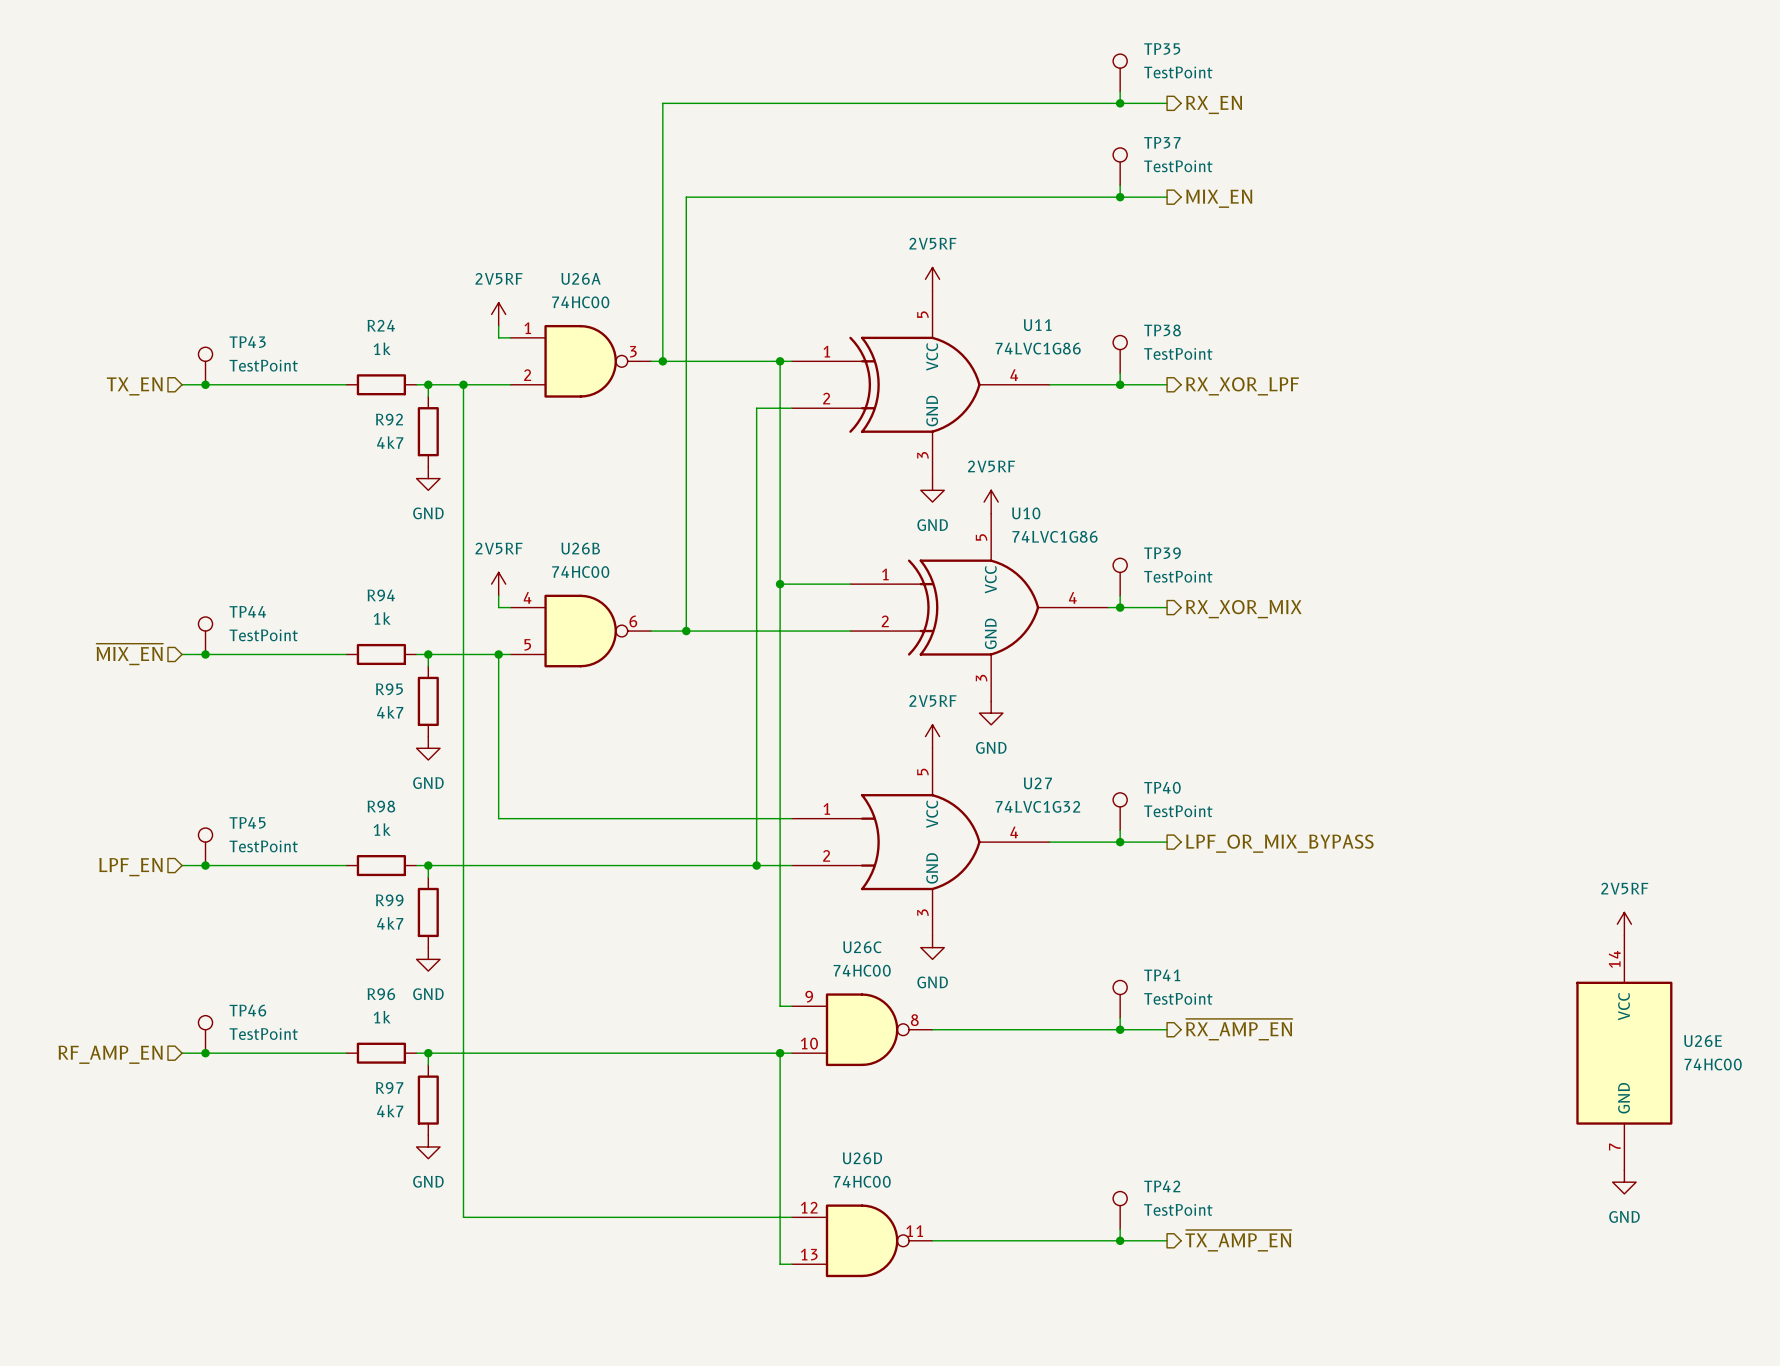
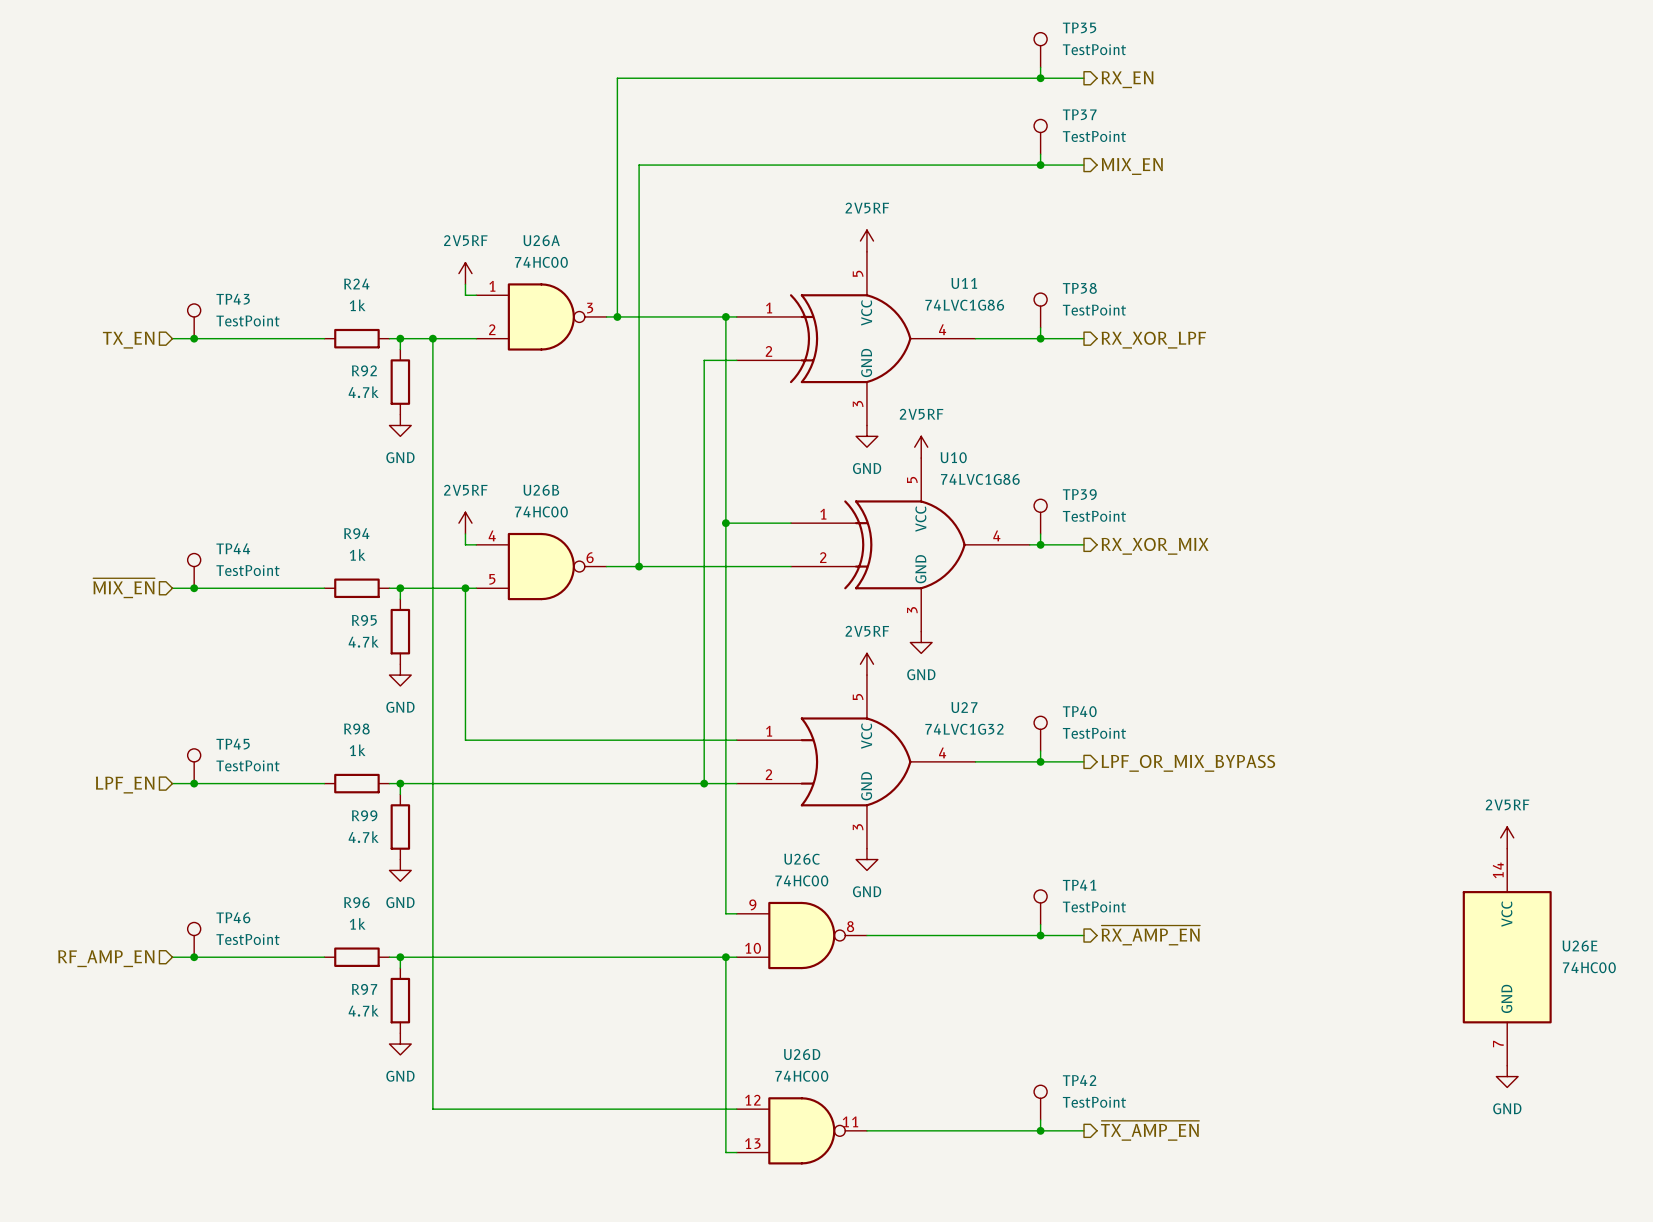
R92 value: 4k7 (390, 442) -> 4.7k (363, 392)
R95 value: 4k7 (390, 712) -> 4.7k (363, 641)
R99 value: 4k7 (390, 923) -> 4.7k (363, 837)
R97 value: 4k7 (390, 1110) -> 4.7k (363, 1010)

